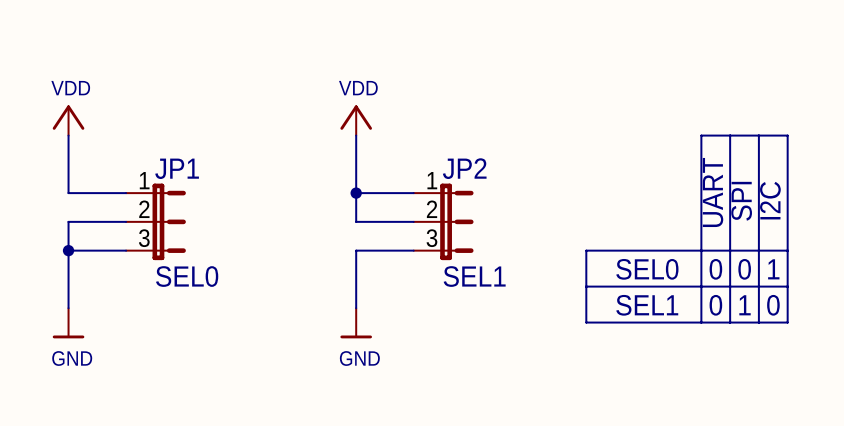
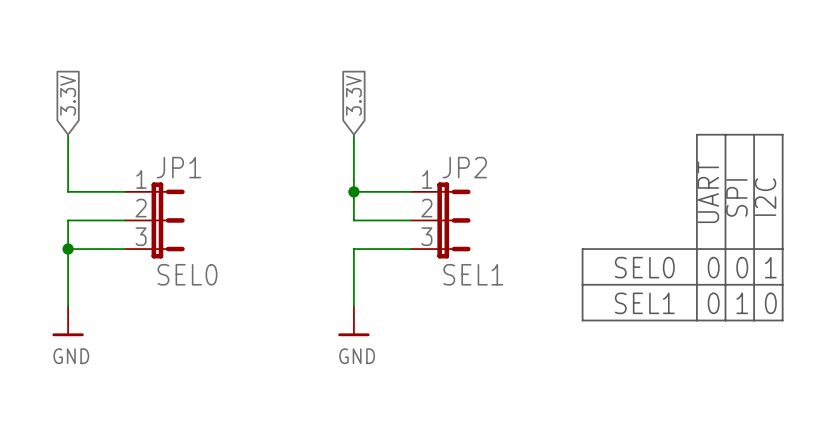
global label: none -> 3.3V (68, 95)
global label: none -> 3.3V (353, 95)
power symbol: VDD (68, 120) -> none
power symbol: VDD (356, 120) -> none

